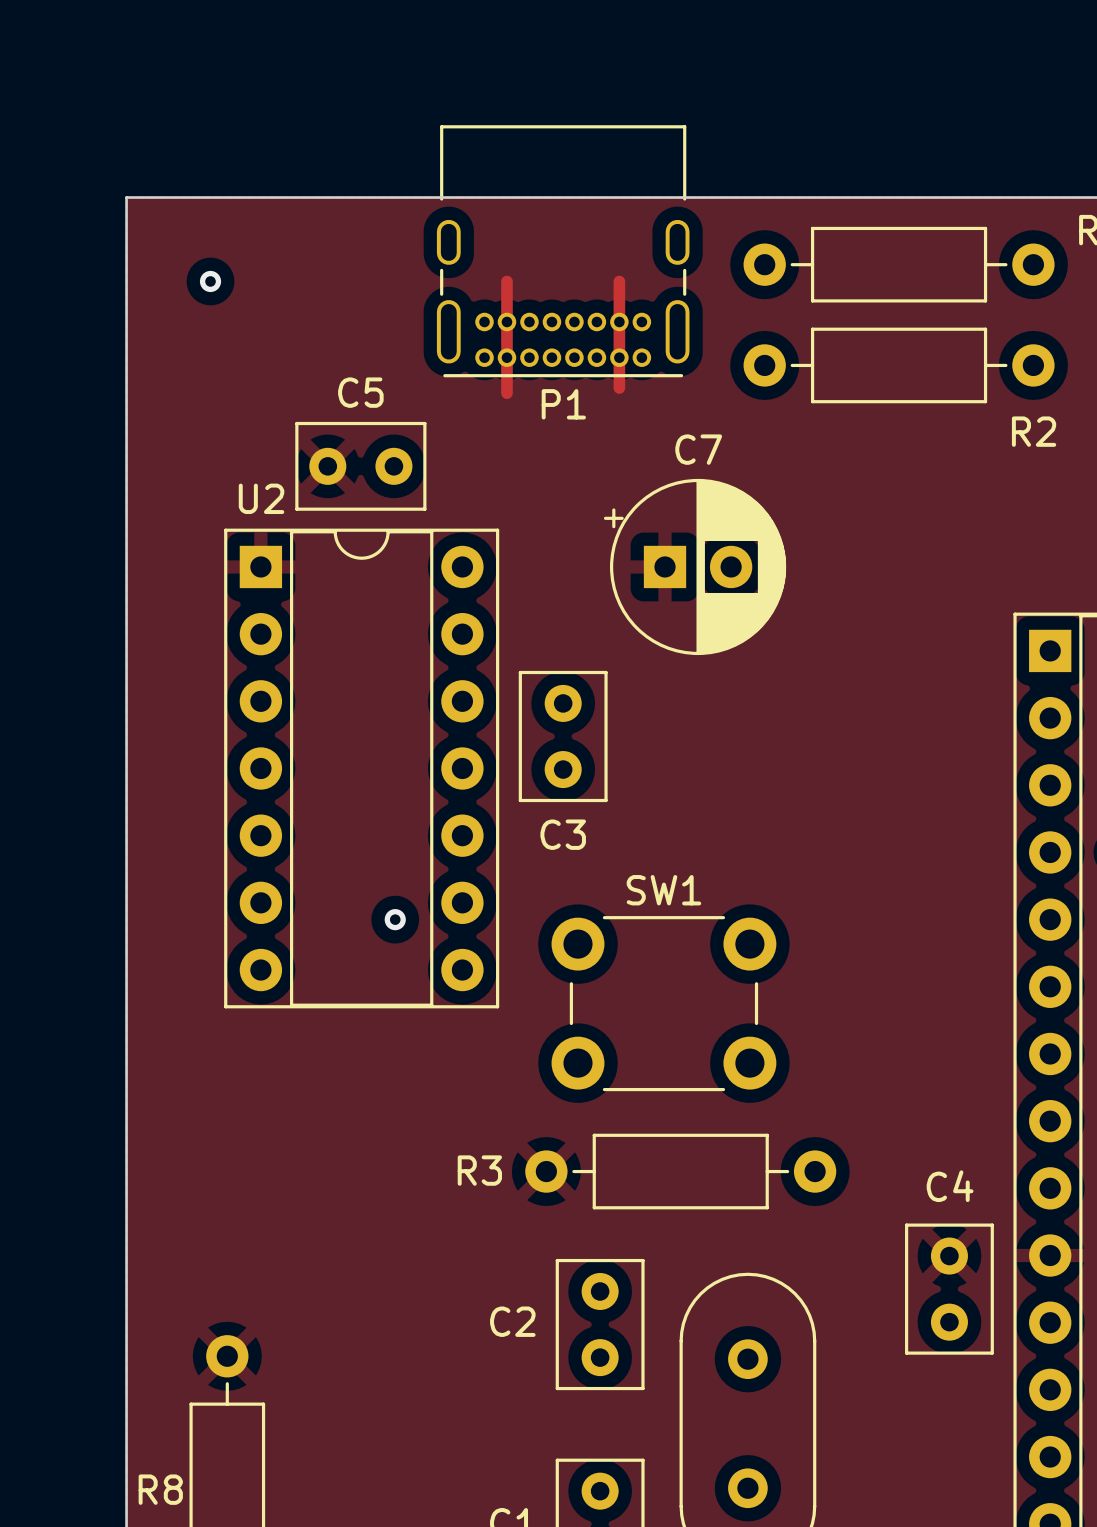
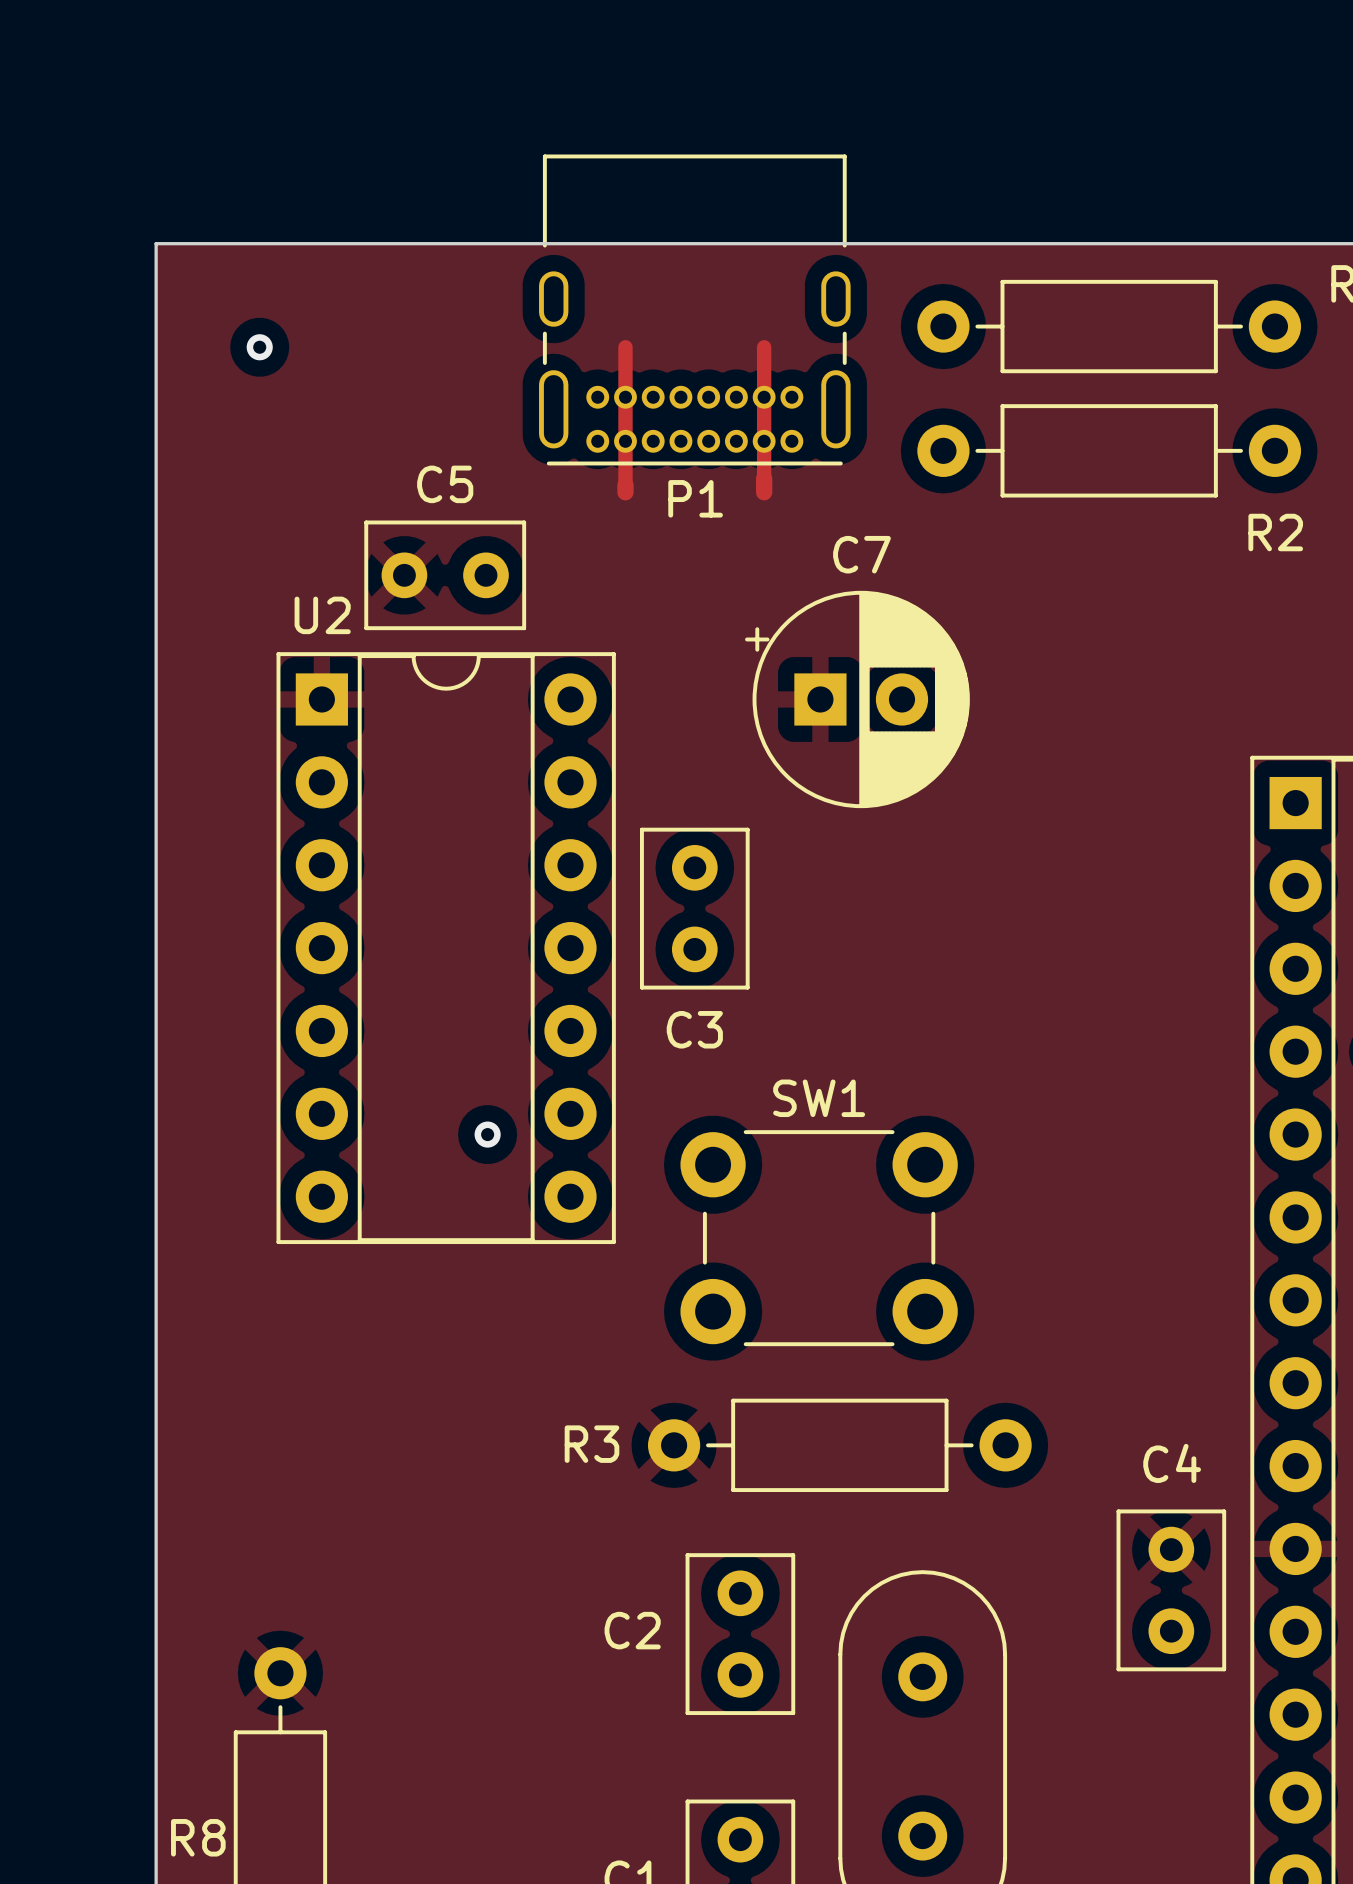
track: none -> (764, 478) (764, 492)
track: none -> (625, 485) (625, 492)

